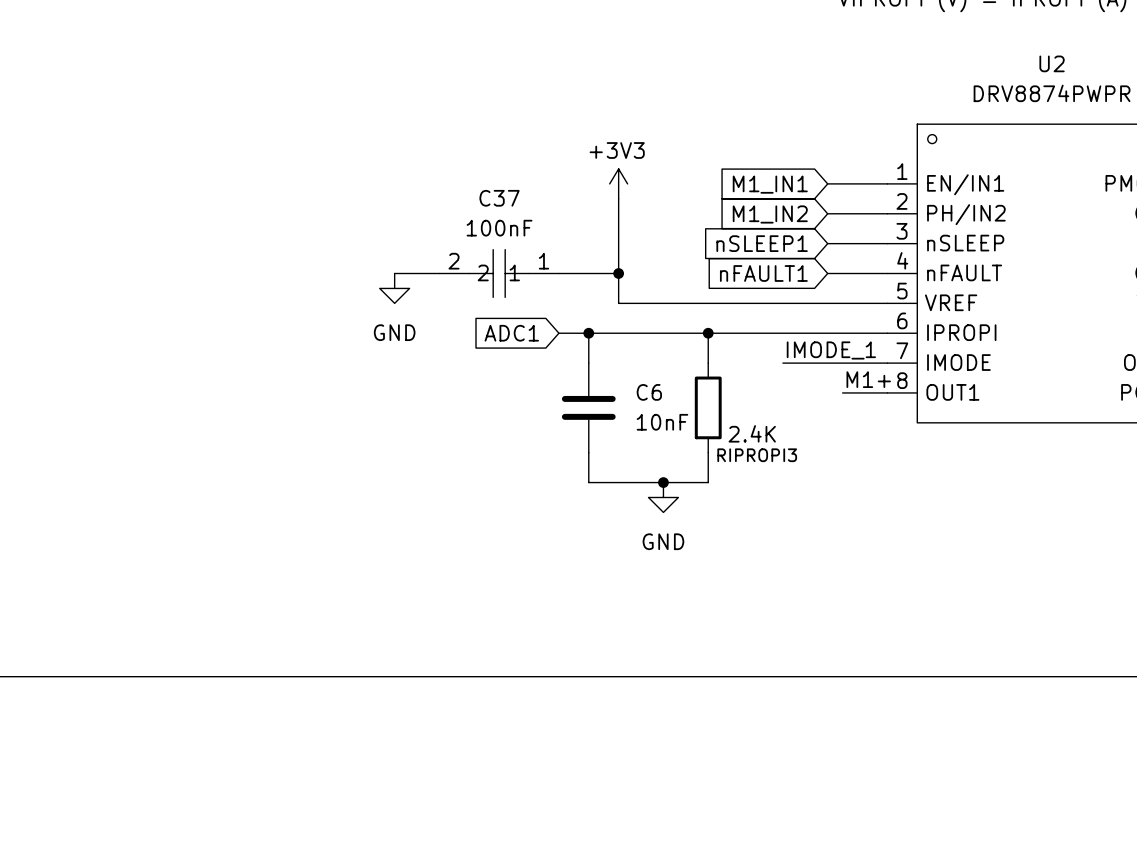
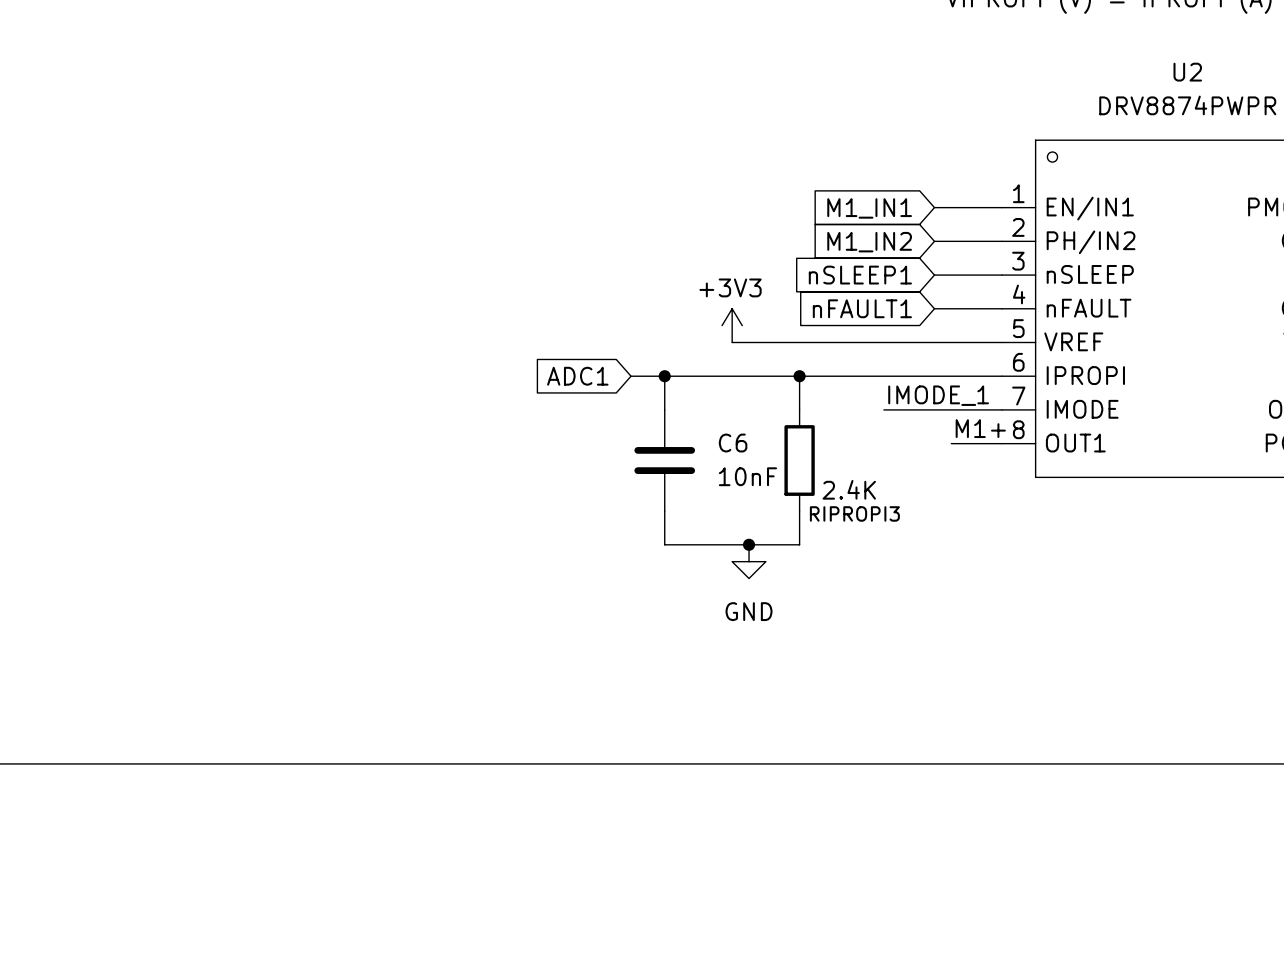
power symbol position: +3V3 (618, 183) -> +3V3 (732, 325)
wire: (618, 198) (618, 303) (648, 303) -> none
wire: (394, 273) (439, 273) -> none
C37: 100nF (499, 273) -> none
wire: (558, 273) (618, 273) -> none
junction: (618, 273) -> none
power symbol: GND (394, 288) -> none

